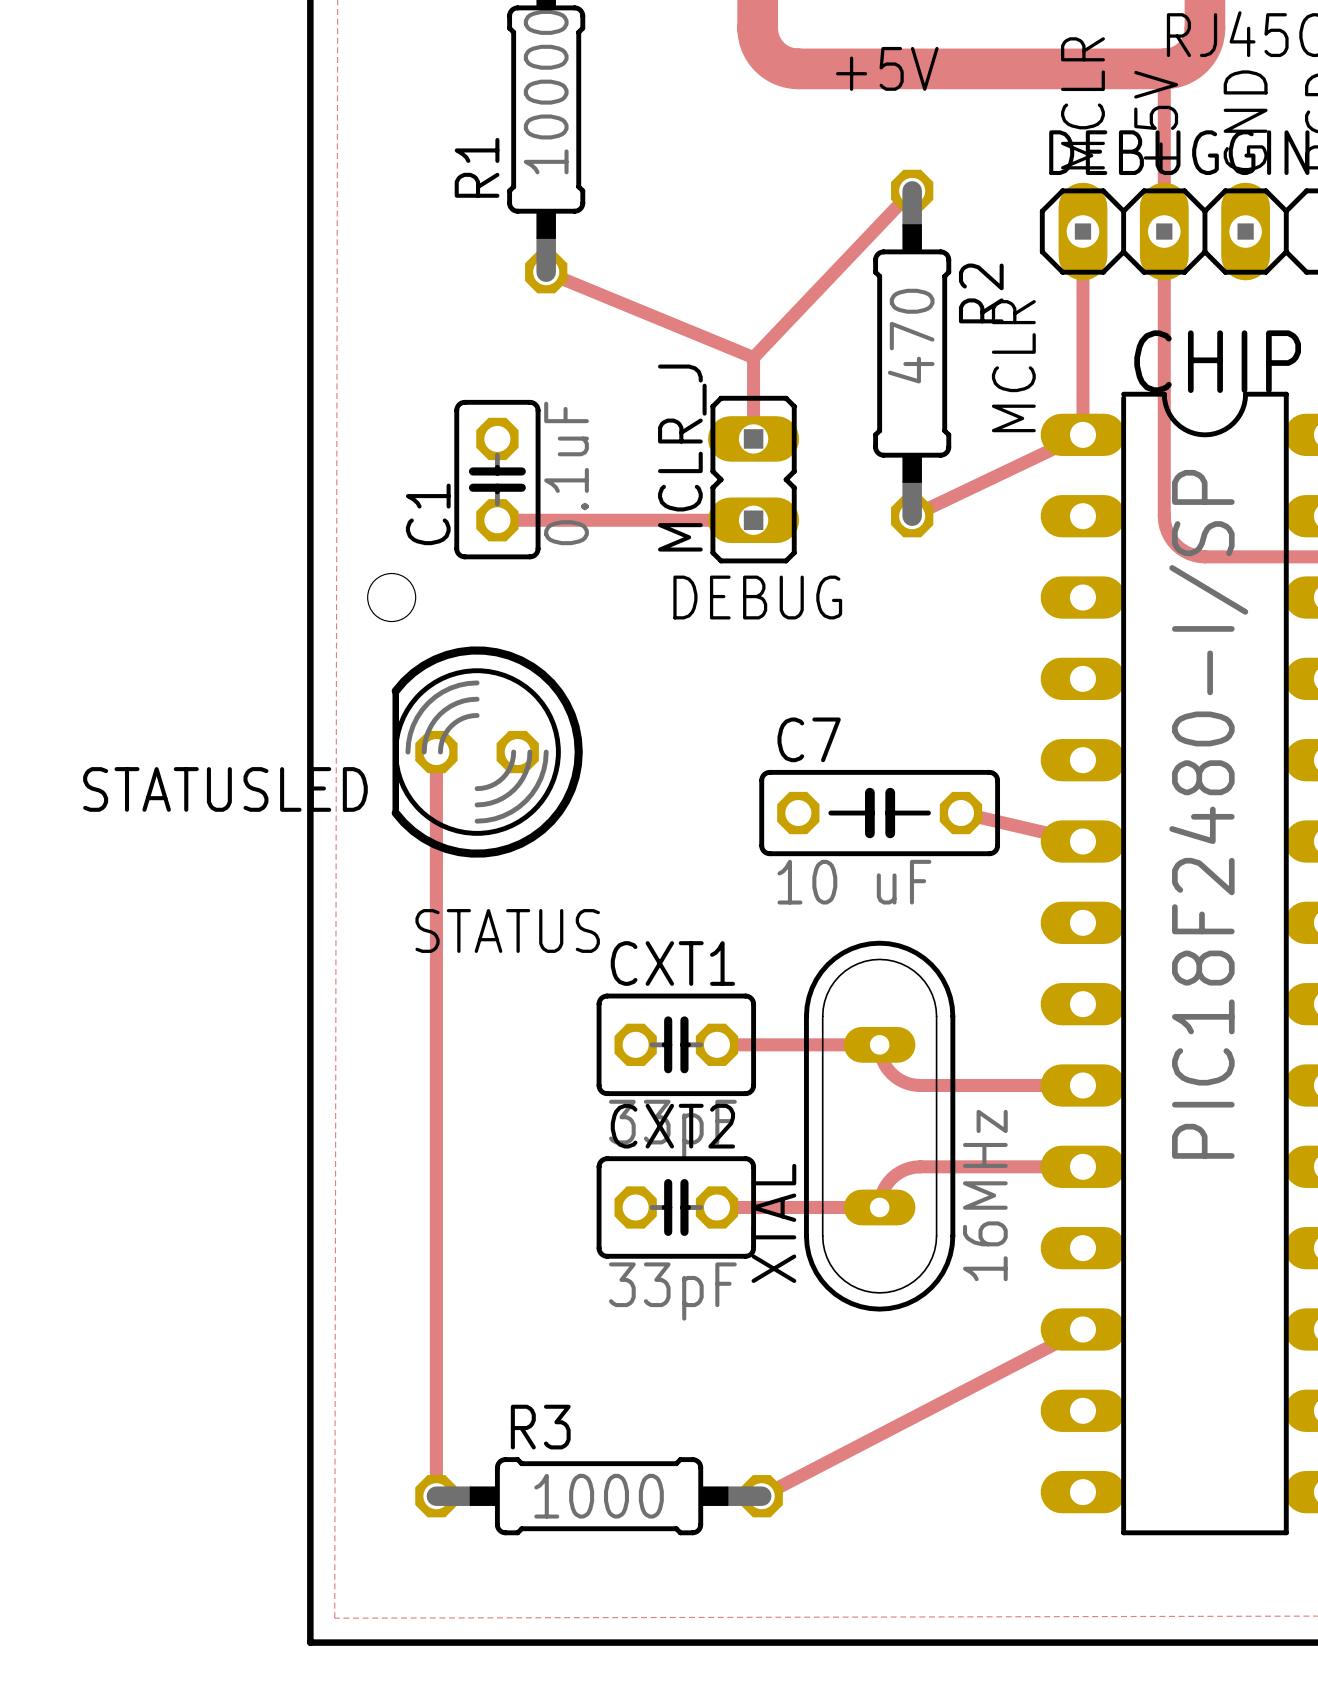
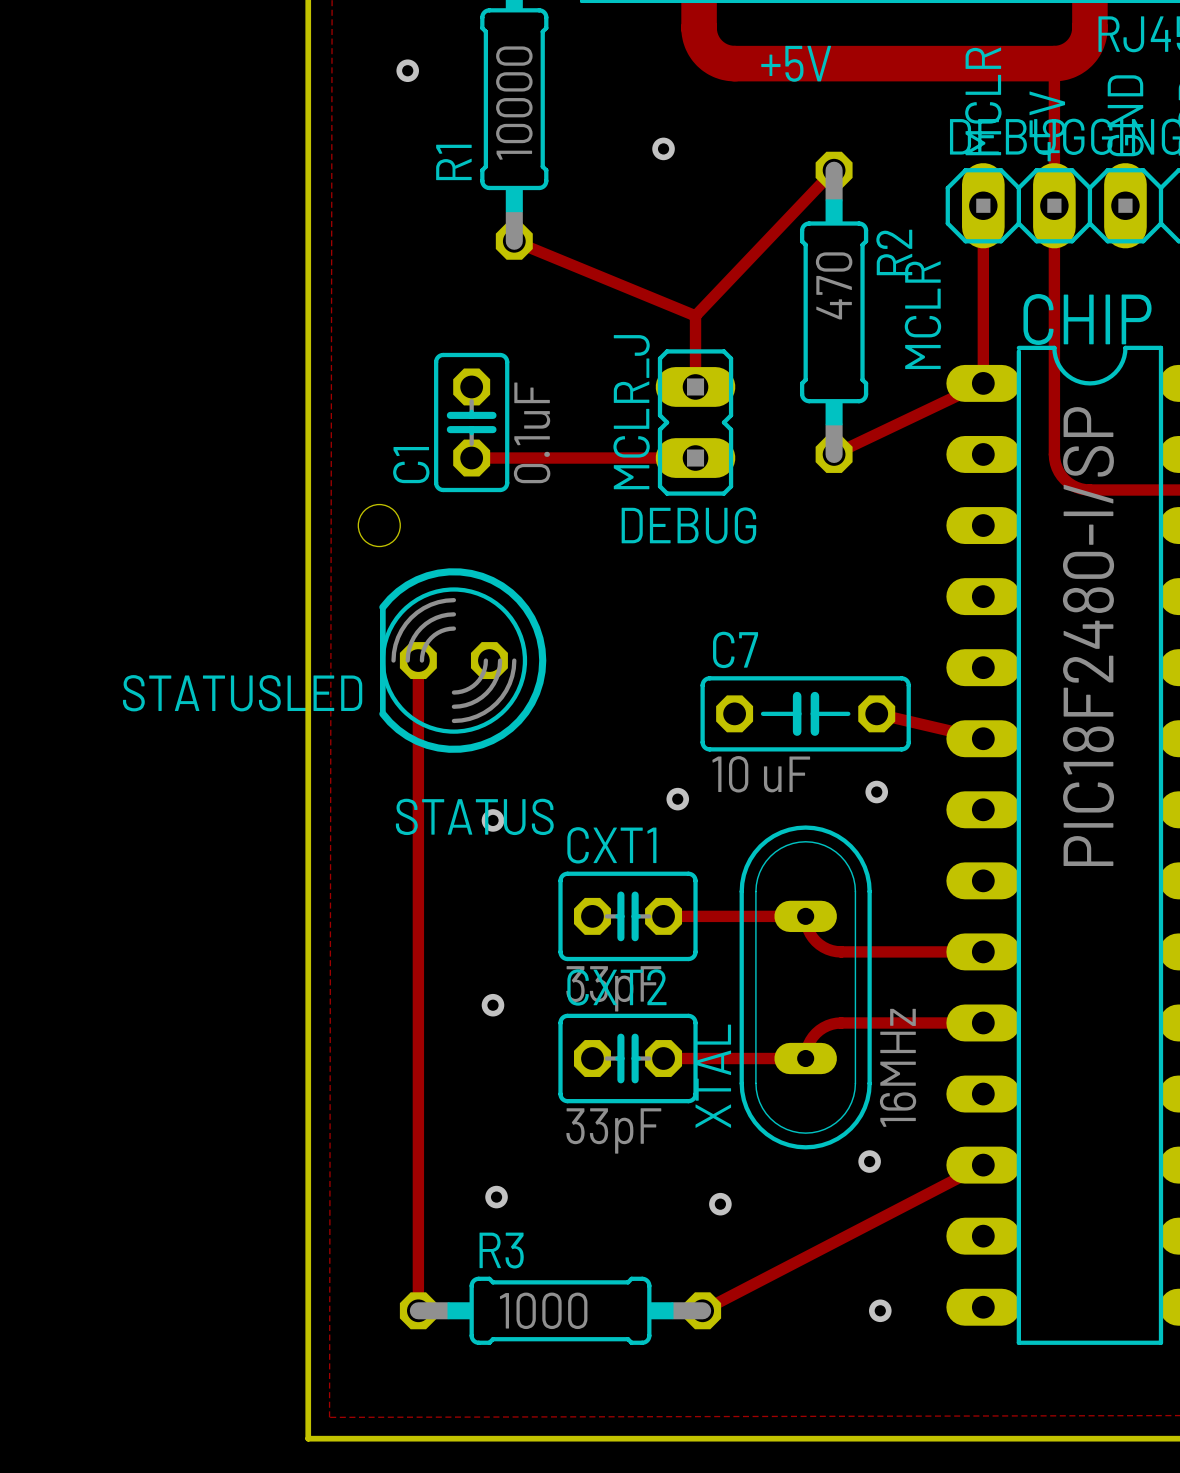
via: none -> (407, 70)
via: none -> (663, 148)
via: none -> (876, 792)
via: none -> (677, 799)
via: none -> (492, 820)
via: none -> (492, 1005)
via: none -> (869, 1161)
via: none -> (496, 1197)
via: none -> (720, 1204)
via: none -> (880, 1310)

